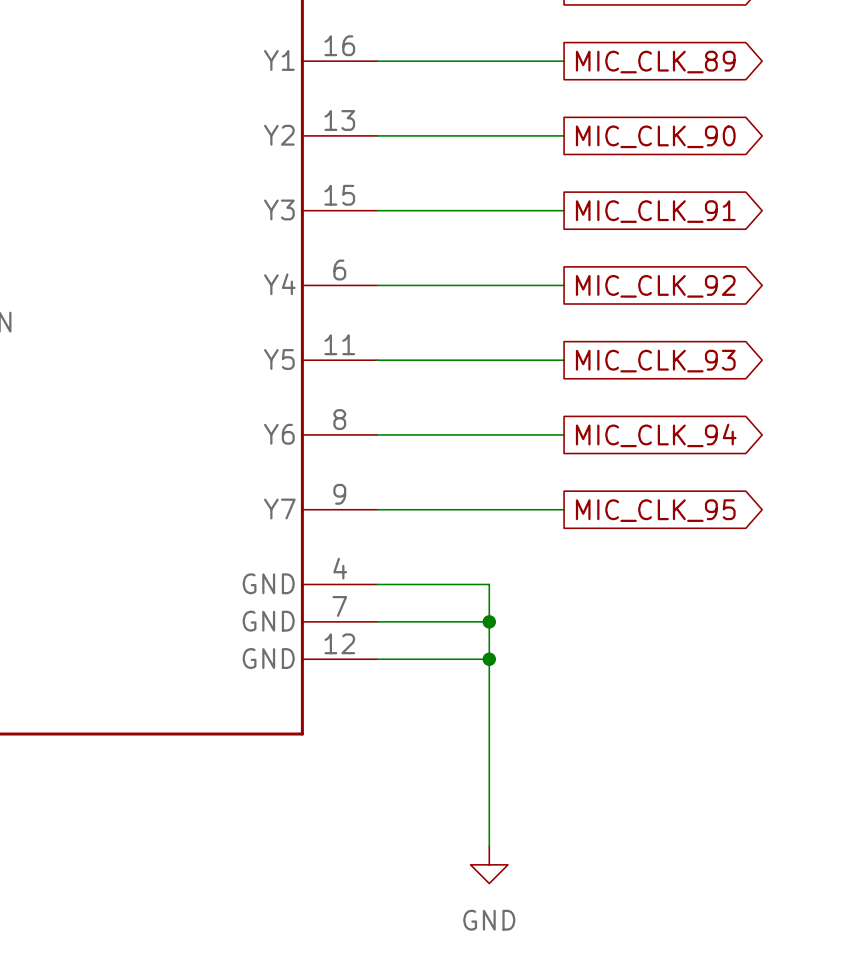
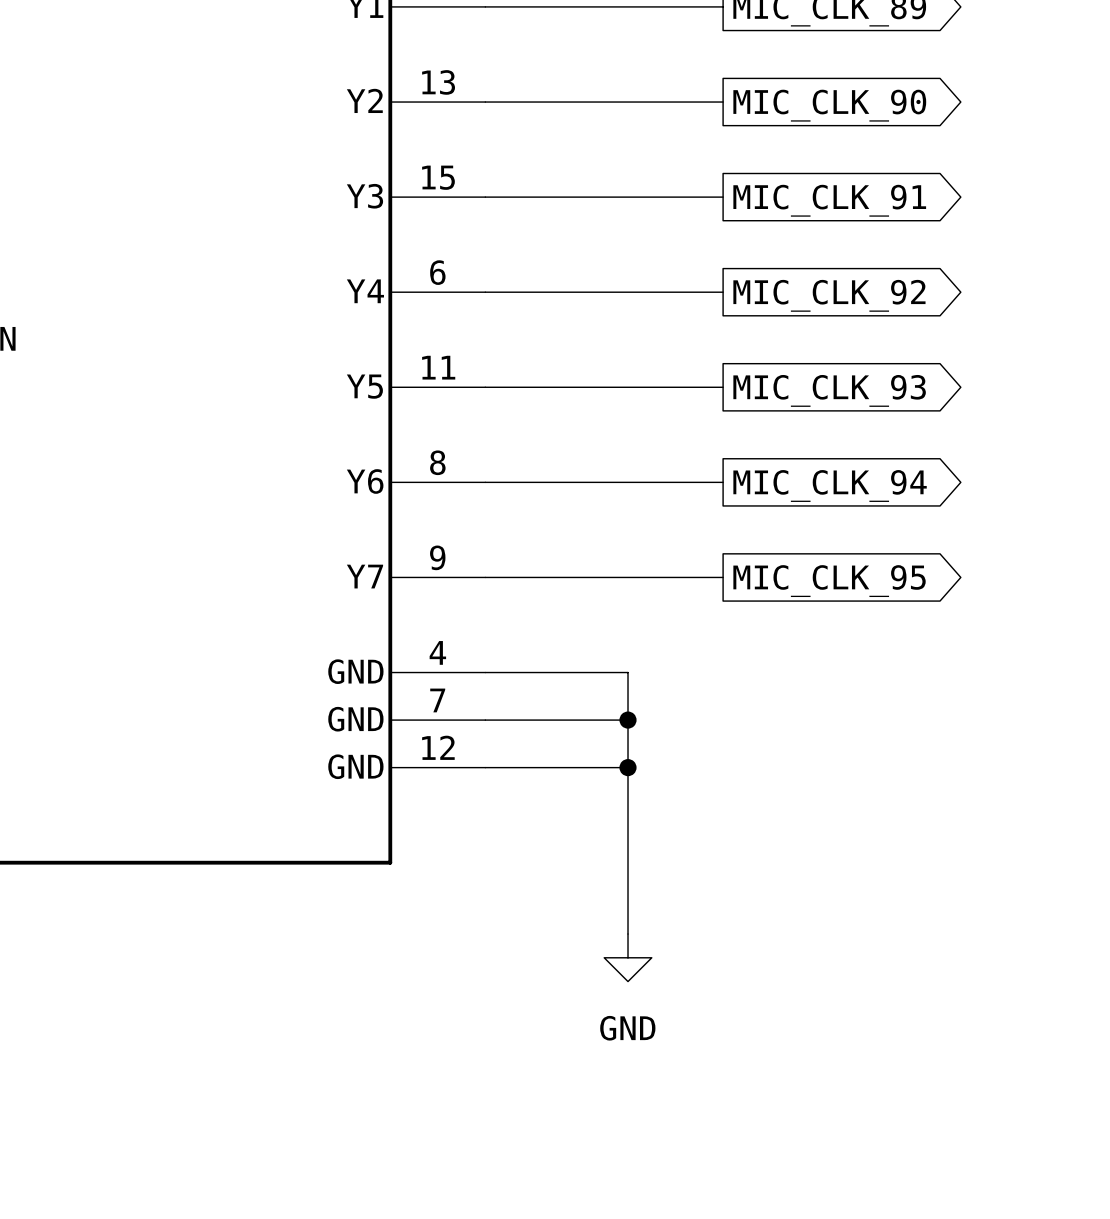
wire: (489, 790) (489, 846) -> none
power symbol position: GND (489, 864) -> GND (628, 957)

